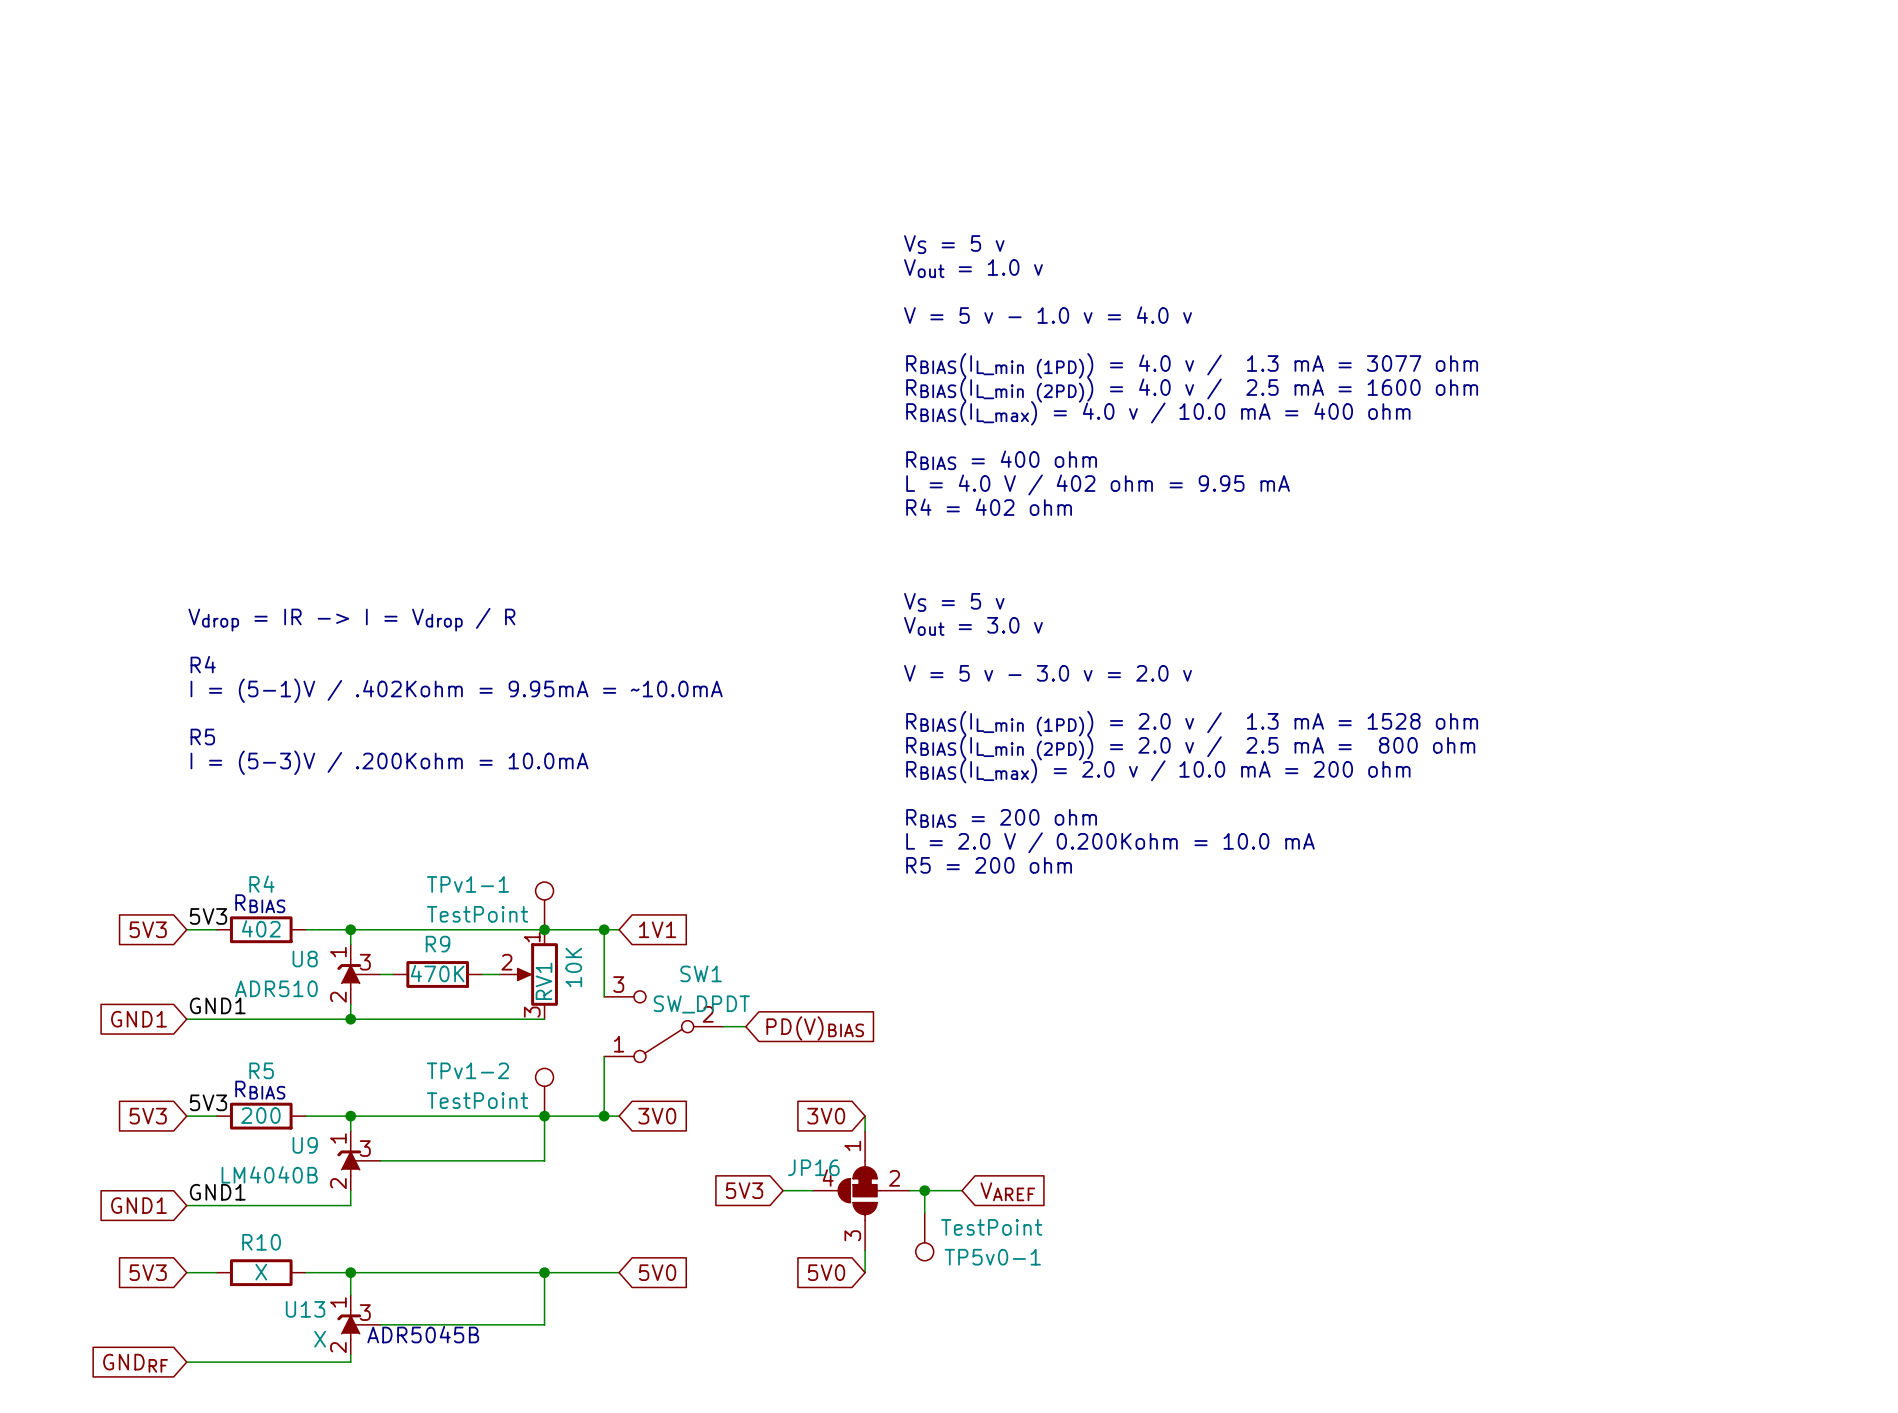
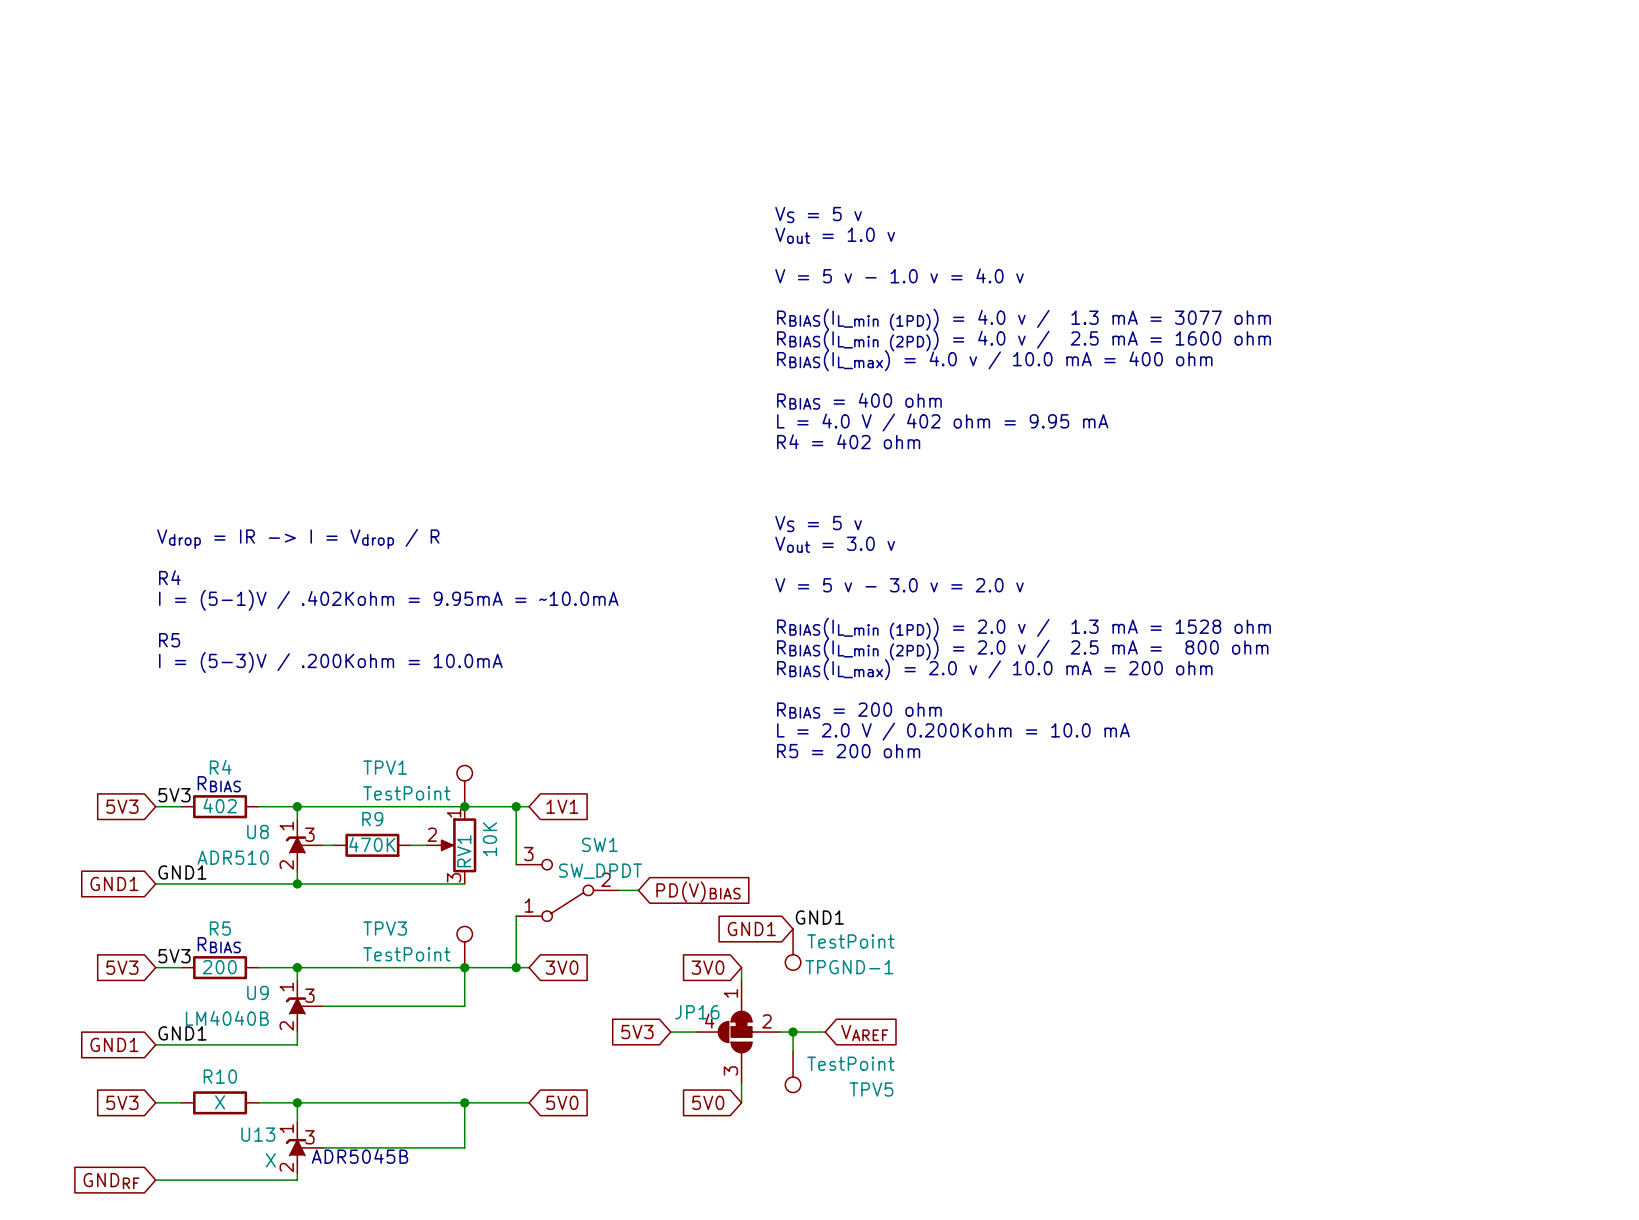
TPv1-1 name: TPv1-1 (467, 884) -> TPV1 (385, 767)
label: none -> GND1 (819, 917)
TPv1-2 name: TPv1-2 (467, 1070) -> TPV3 (385, 928)
global label: none -> GND1 (751, 929)
TPGND-1: none -> TestPoint (793, 949)
TP5v0-1 name: TP5v0-1 (992, 1257) -> TPV5 (871, 1089)

